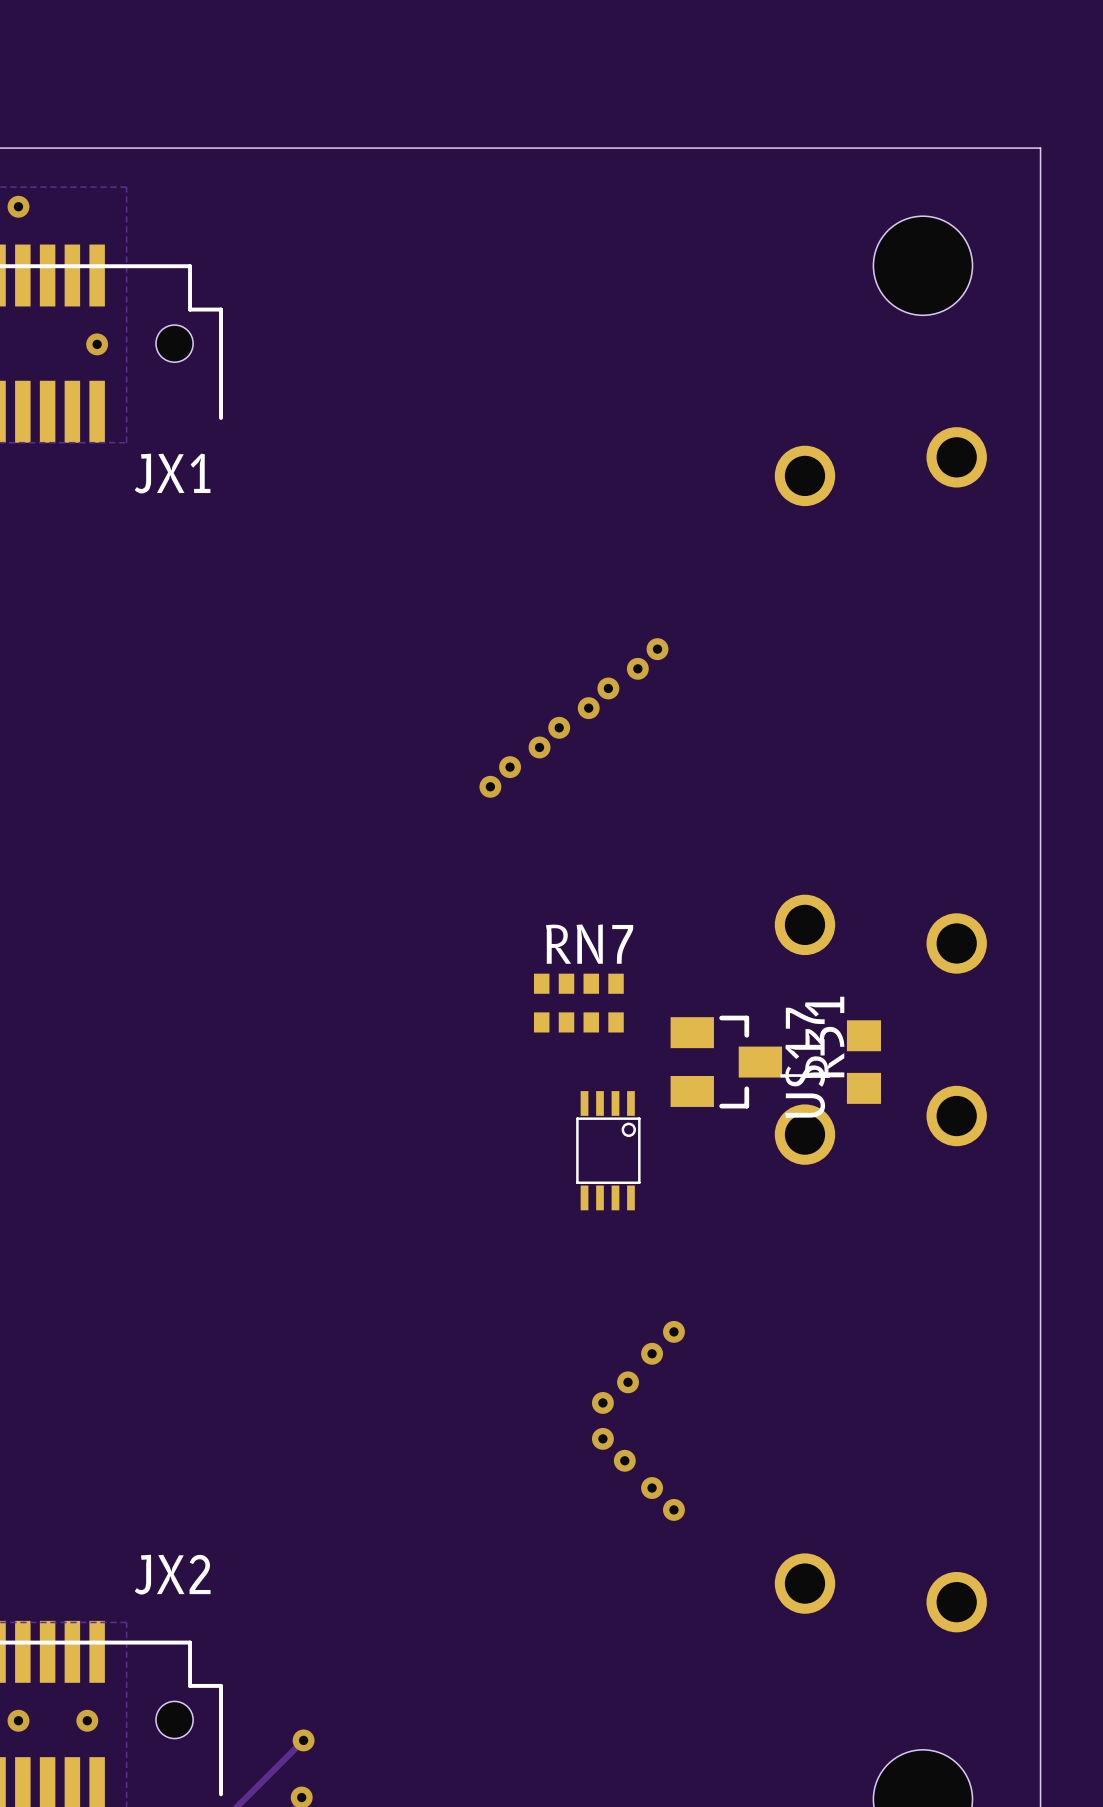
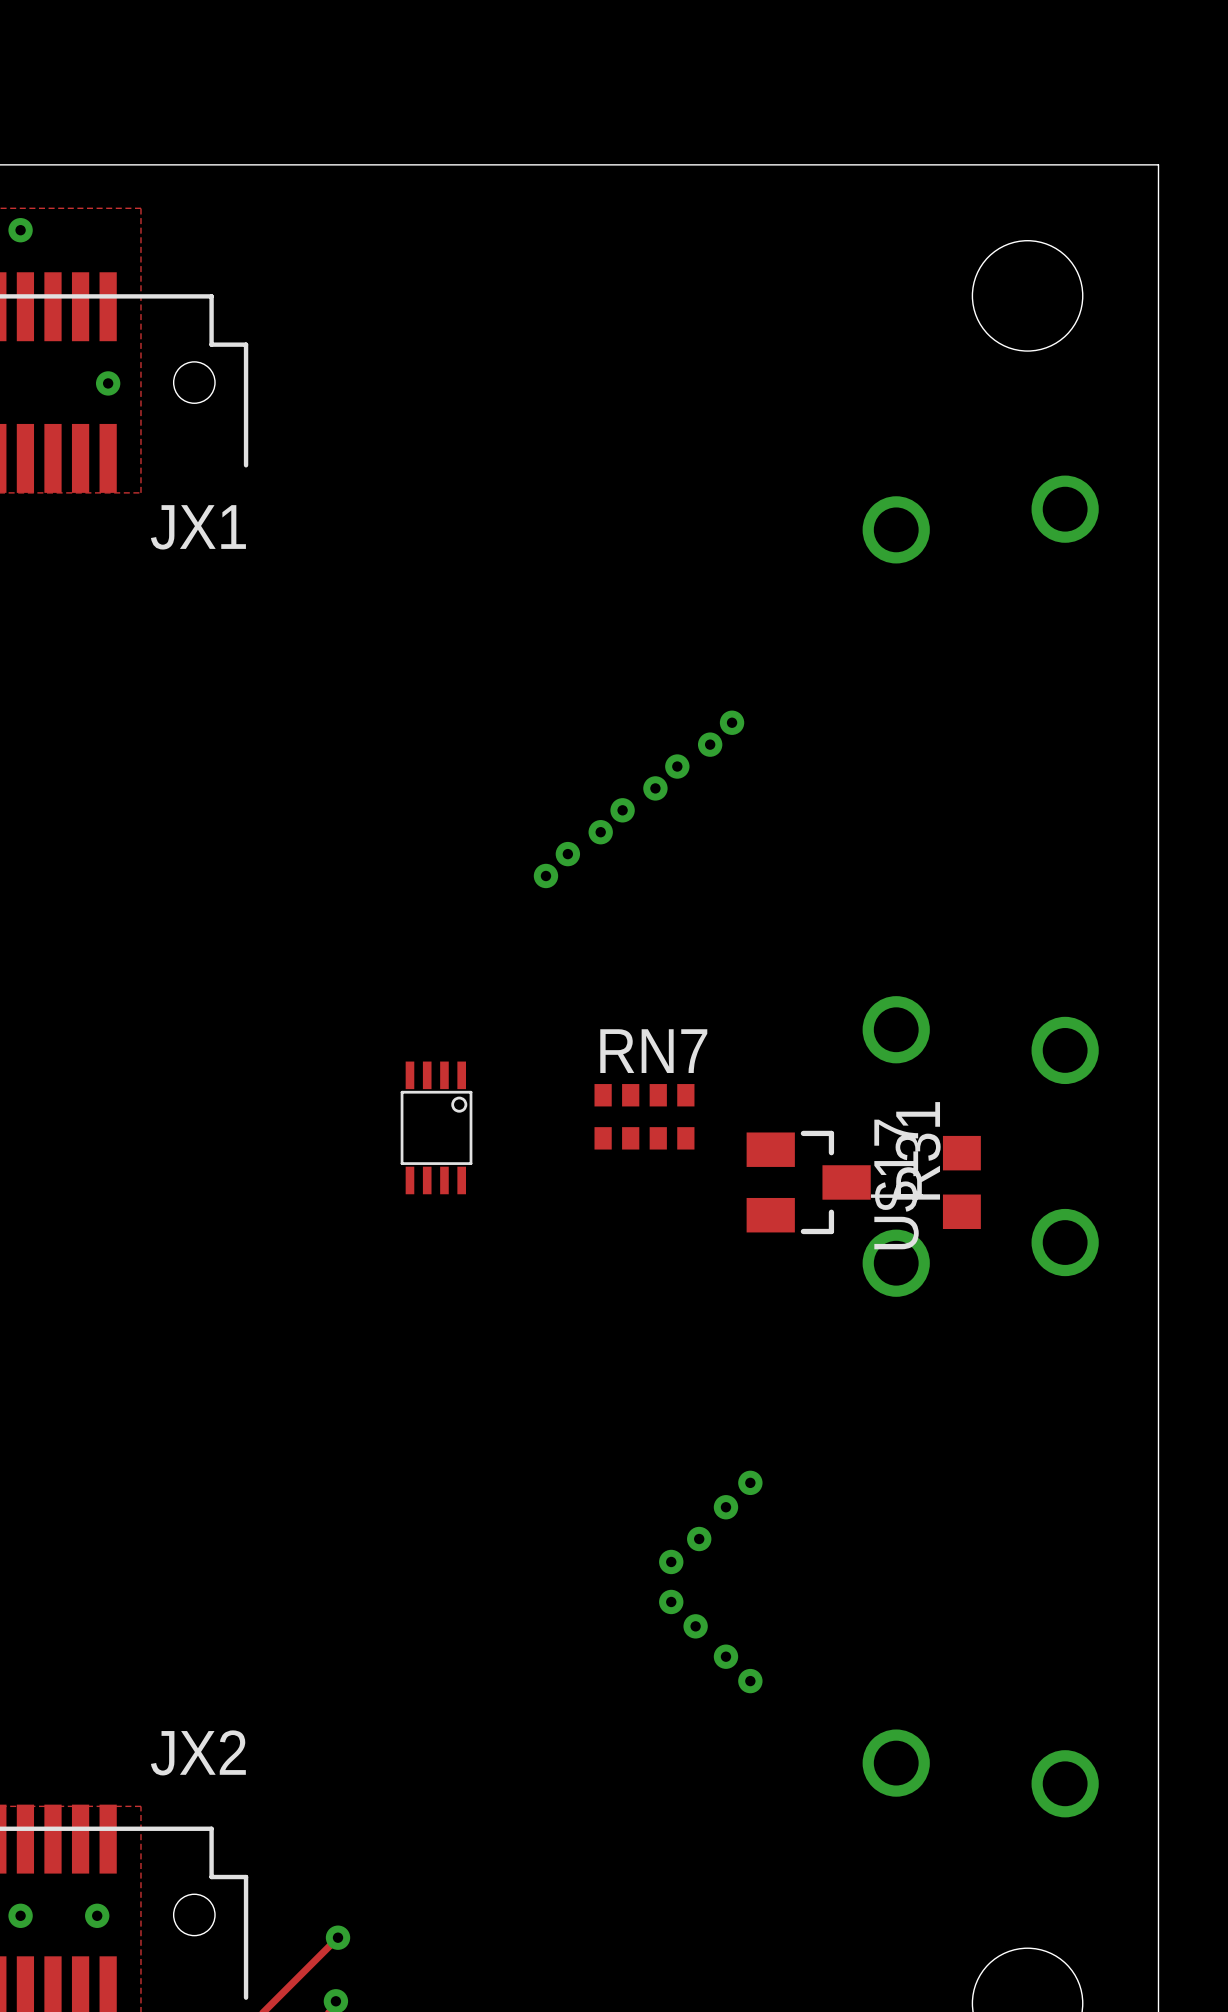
part position: (608, 1150) -> (436, 1127)

